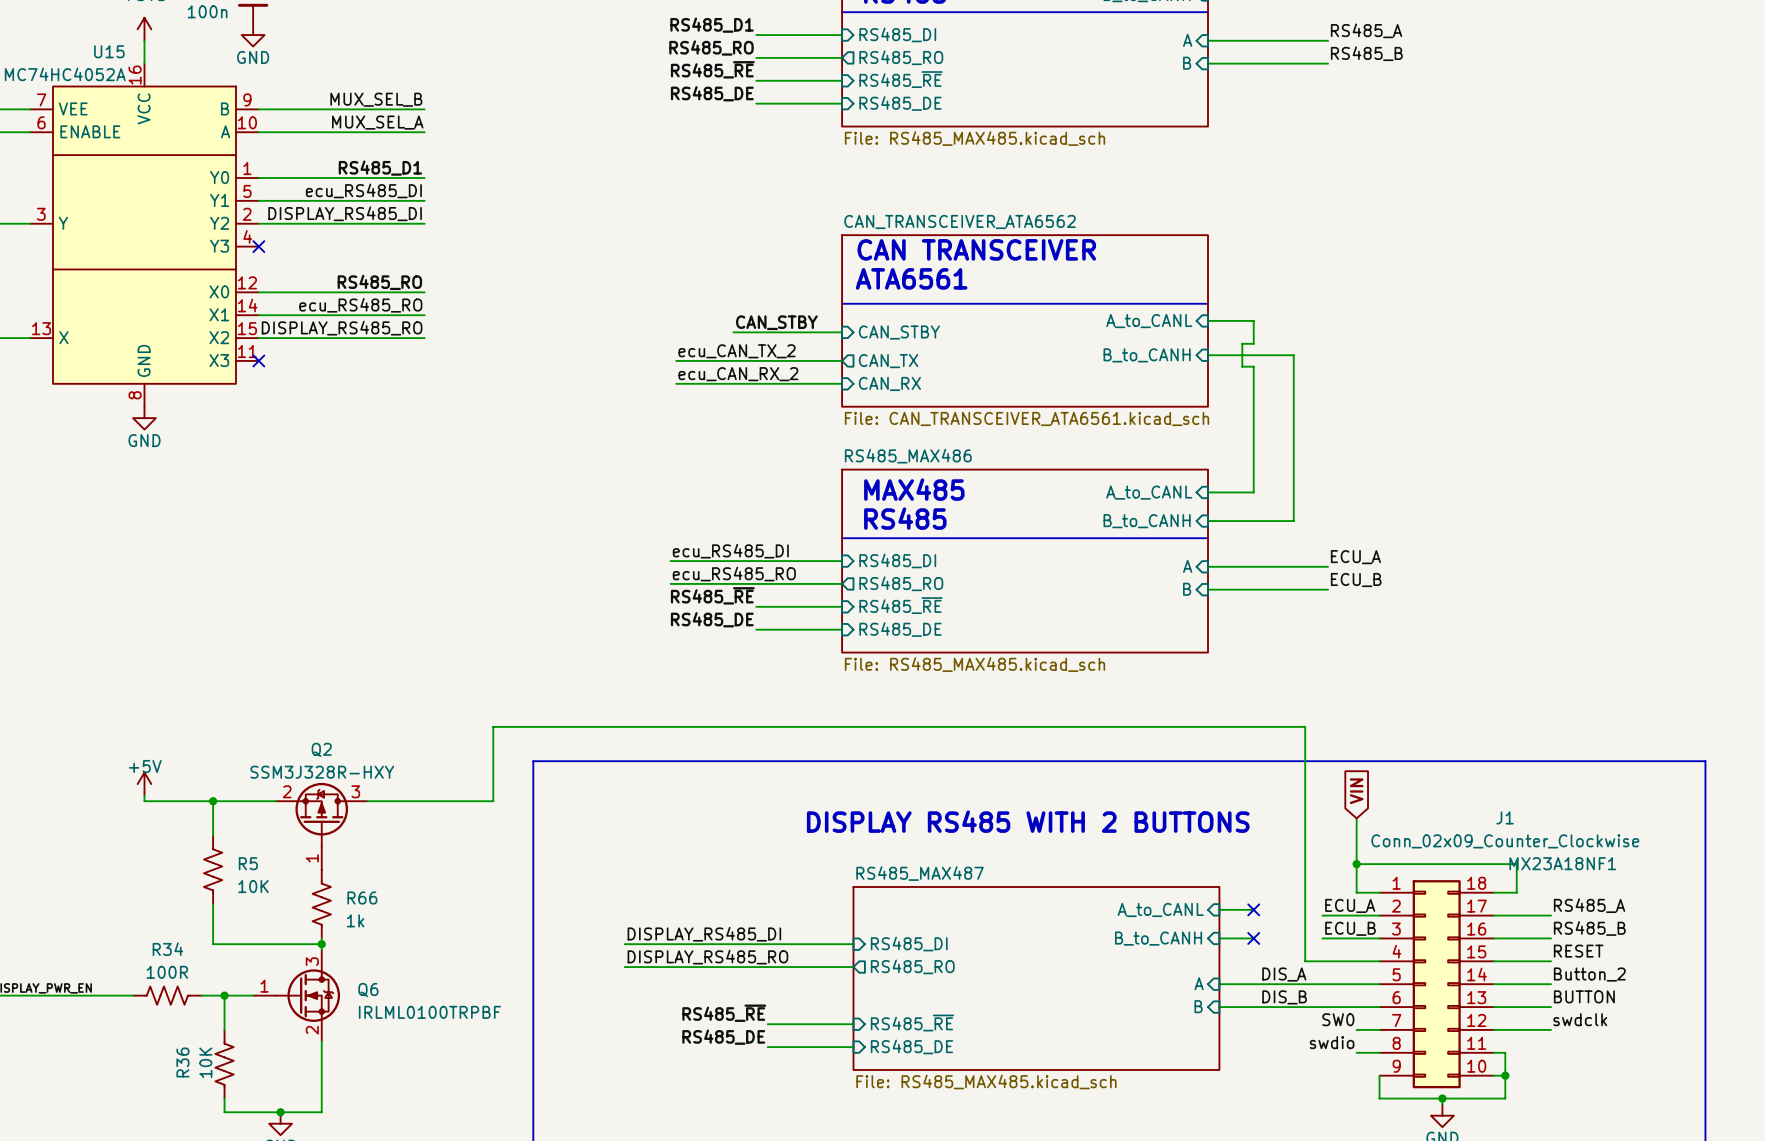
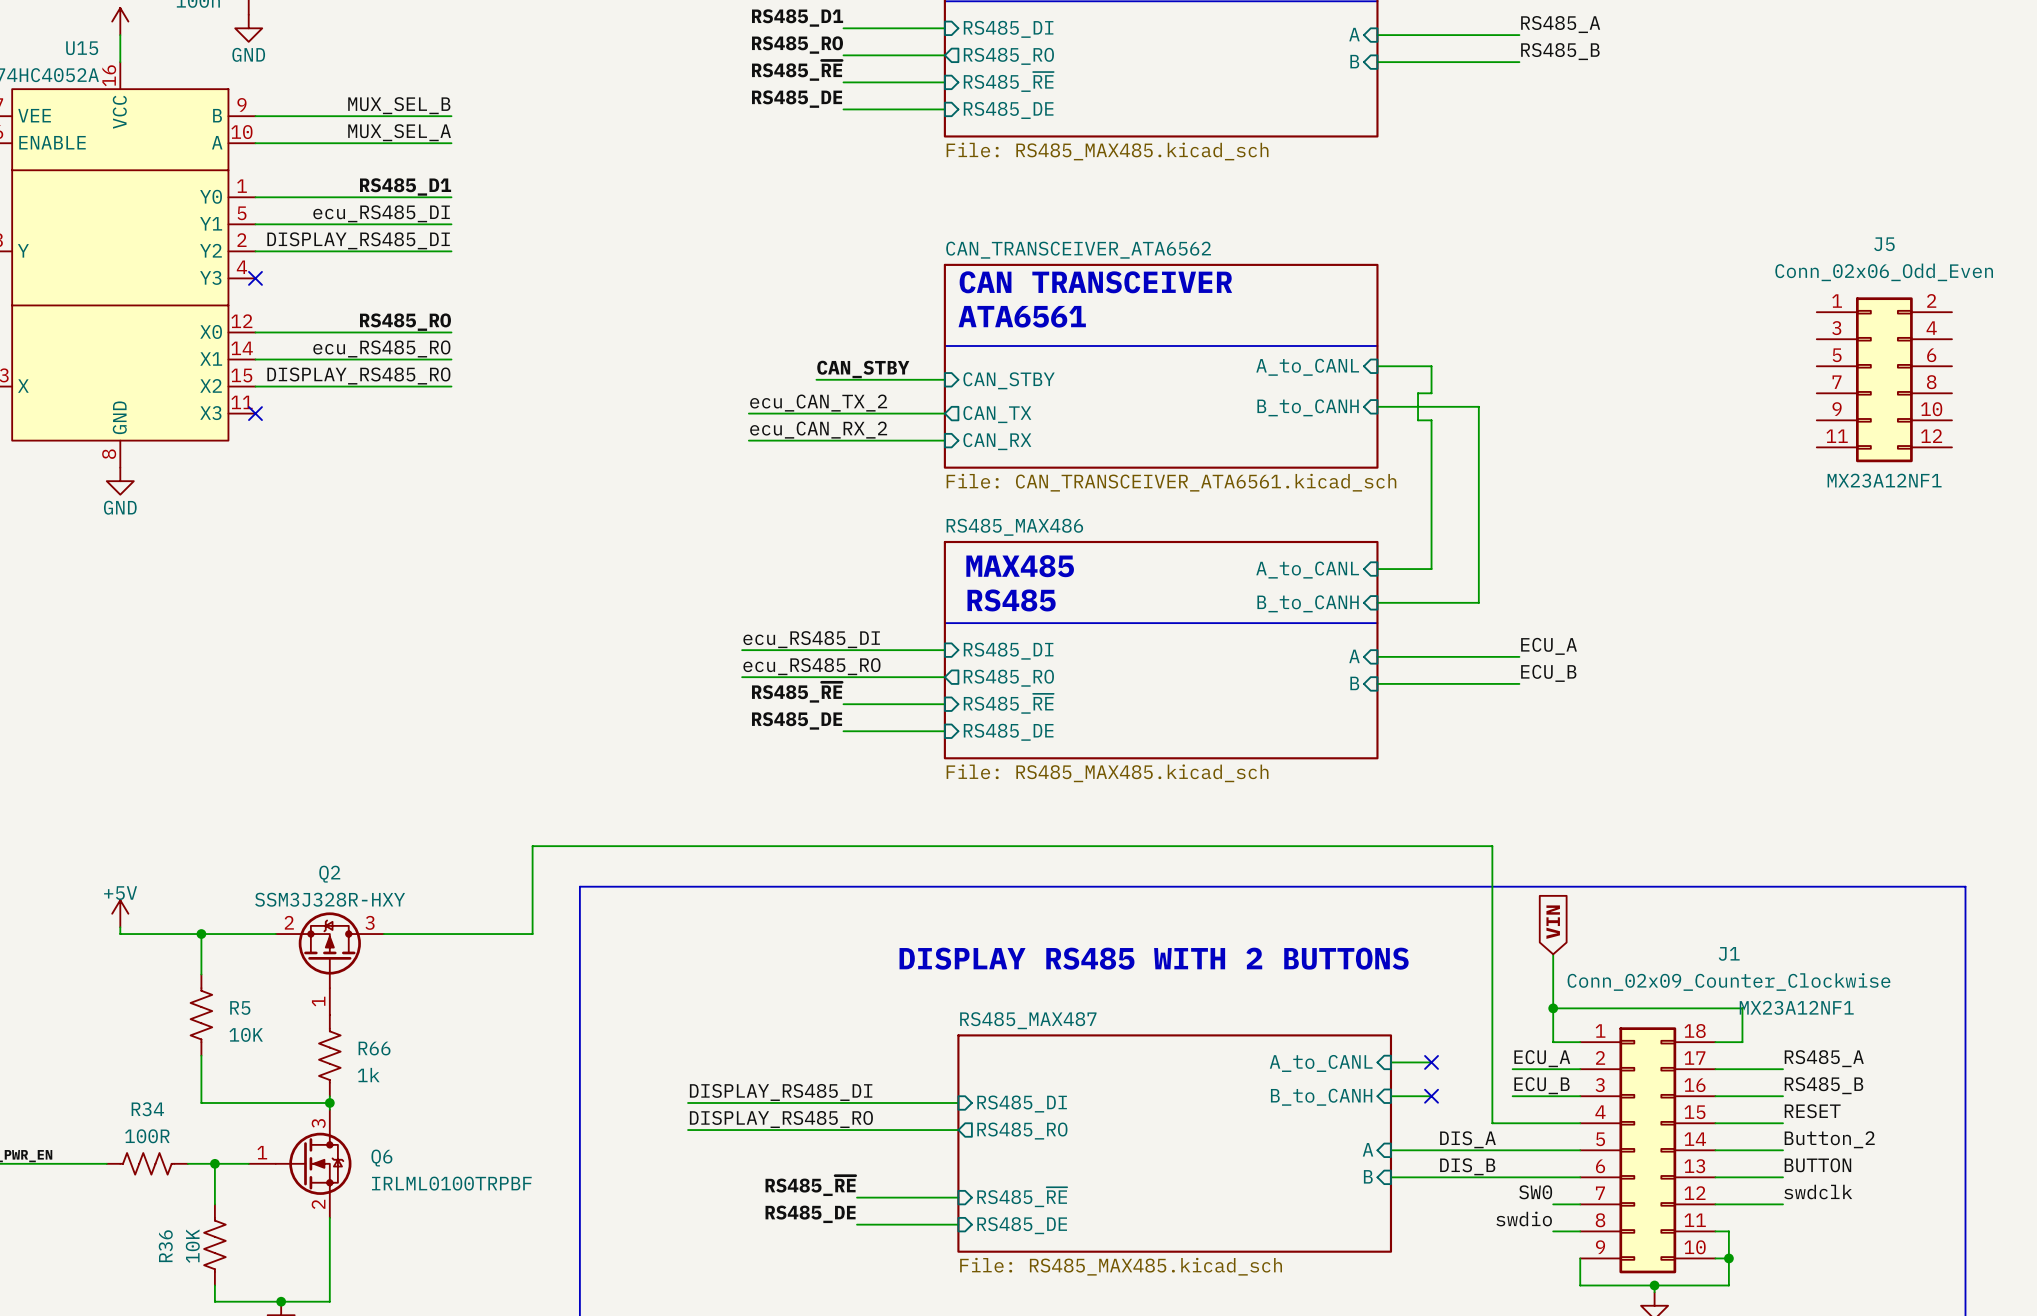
J5: none -> Conn_02x06_Odd_Even (1884, 379)
J1 text: MX23A18NF1 (1562, 863) -> MX23A12NF1 (1796, 1007)

